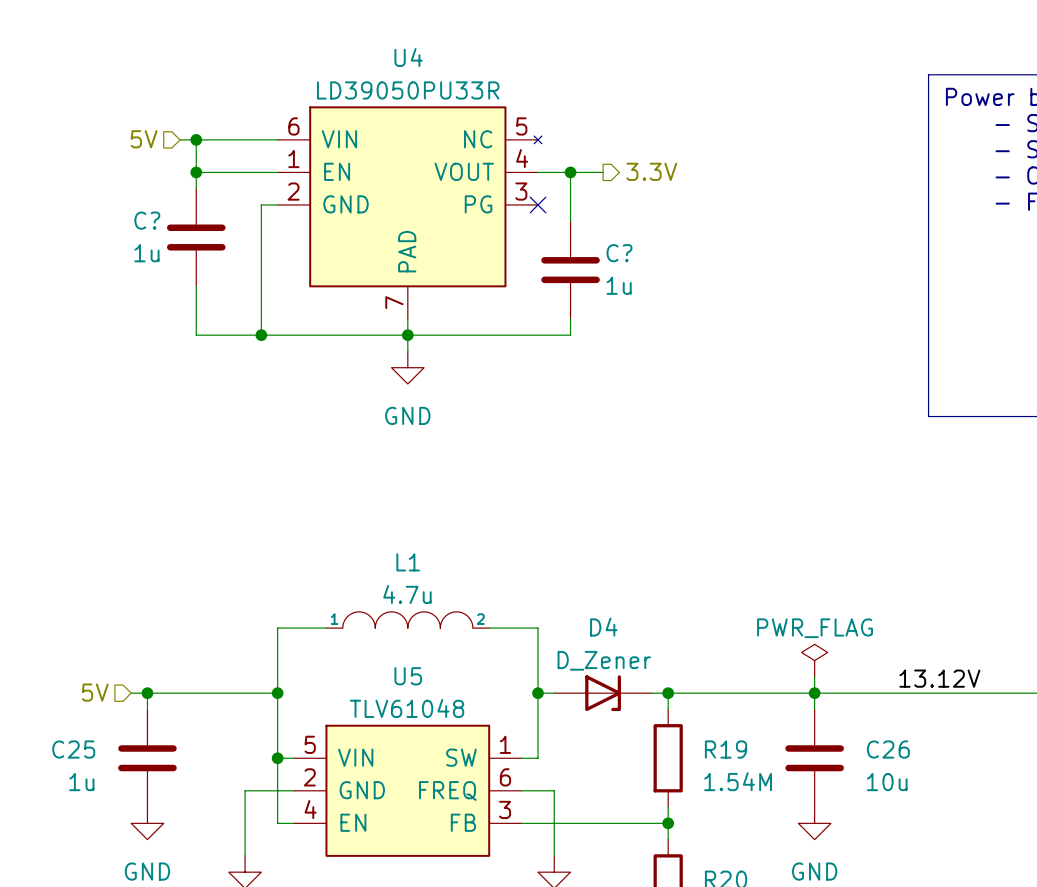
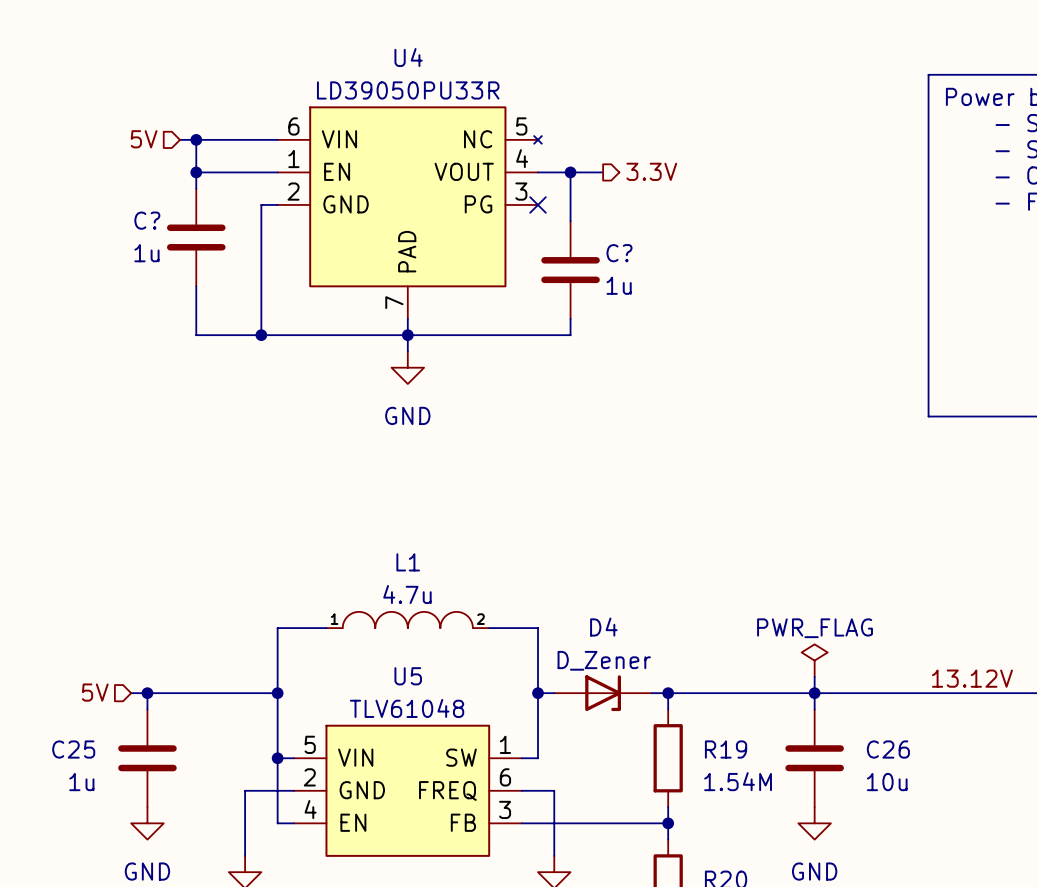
label position: 13.12V (939, 678) -> 13.12V (972, 678)

